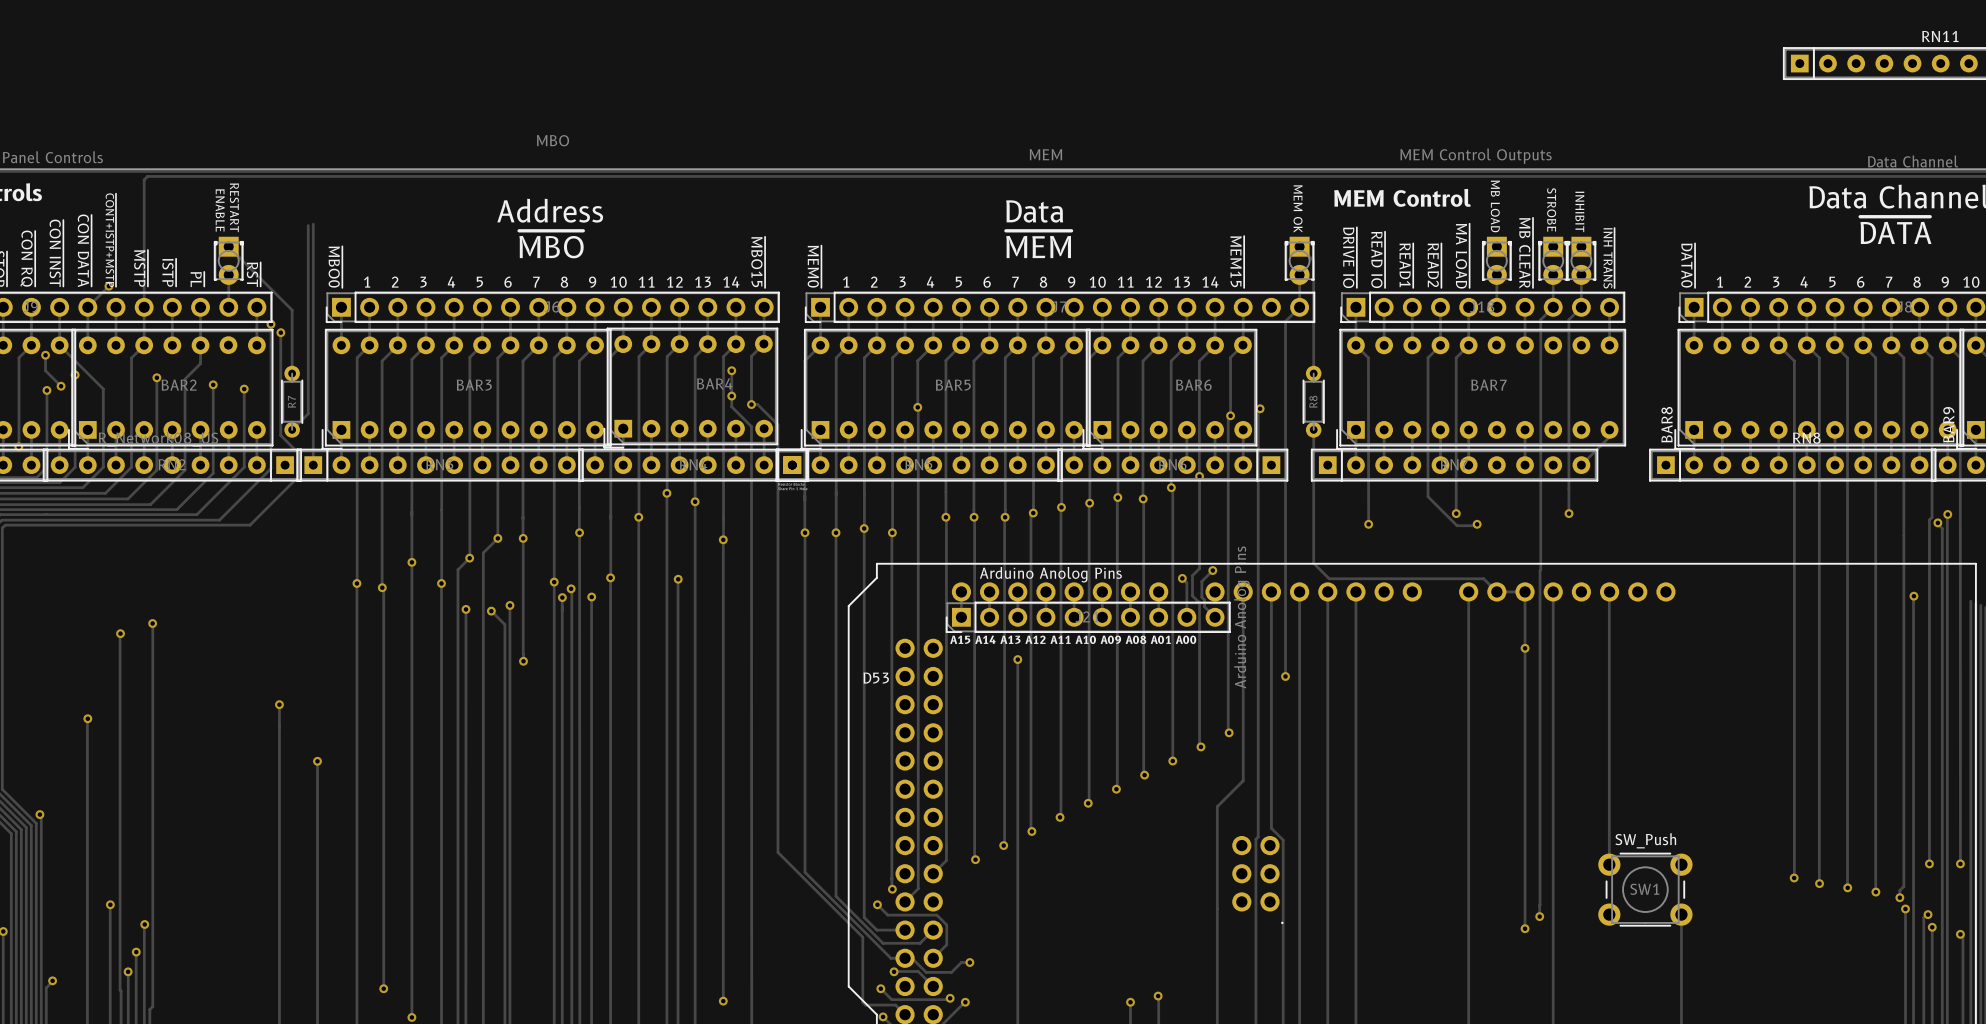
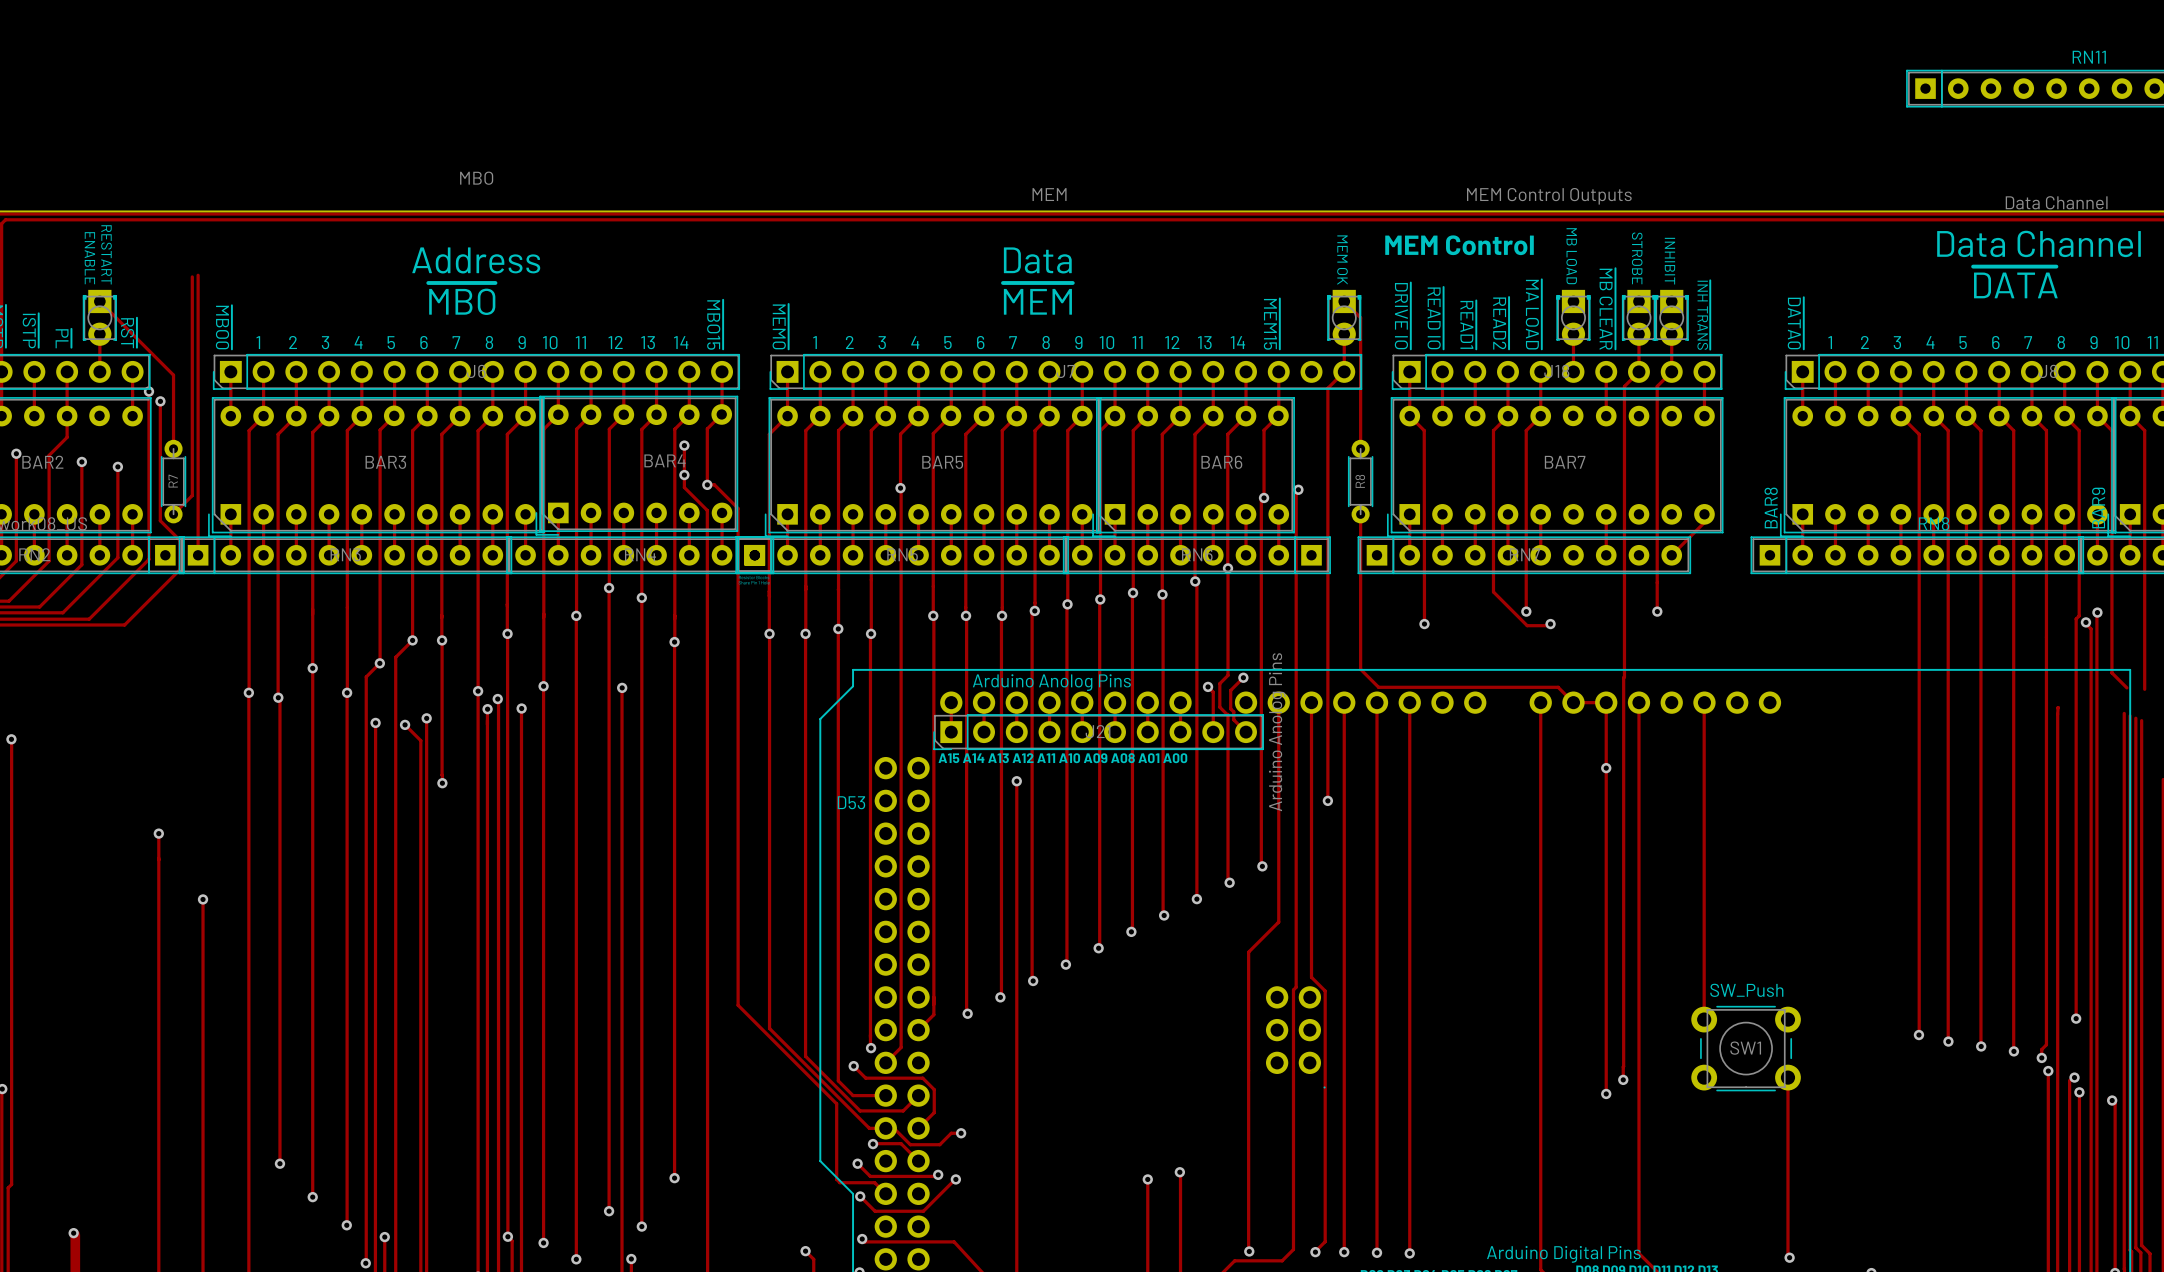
track: (1960, 357) (1960, 864) -> (2111, 430) (2111, 672) (2126, 687)
via: (1913, 596) -> none
via: (1960, 863) -> none

